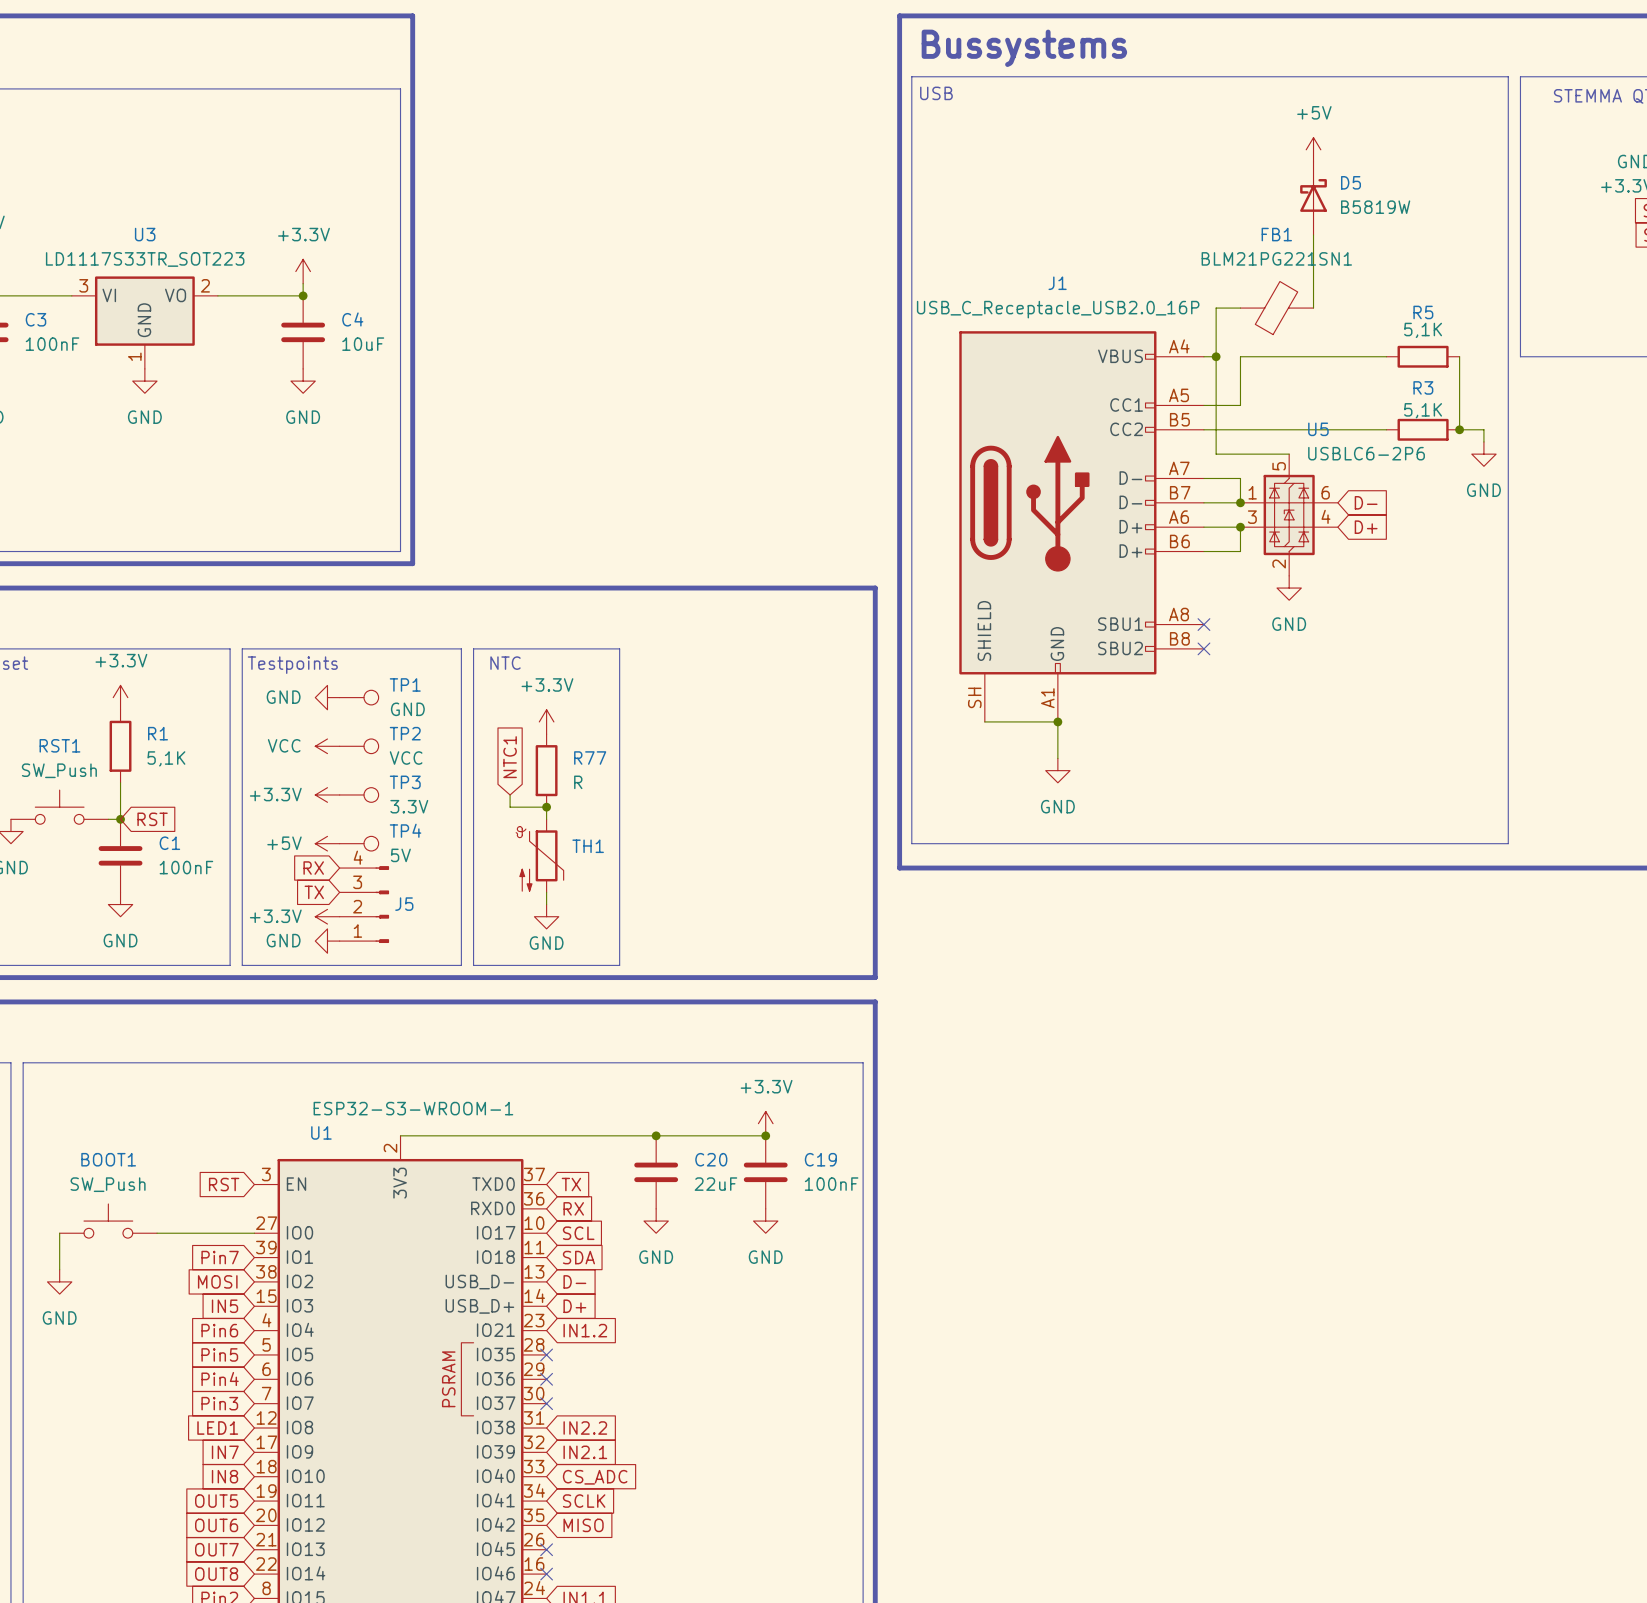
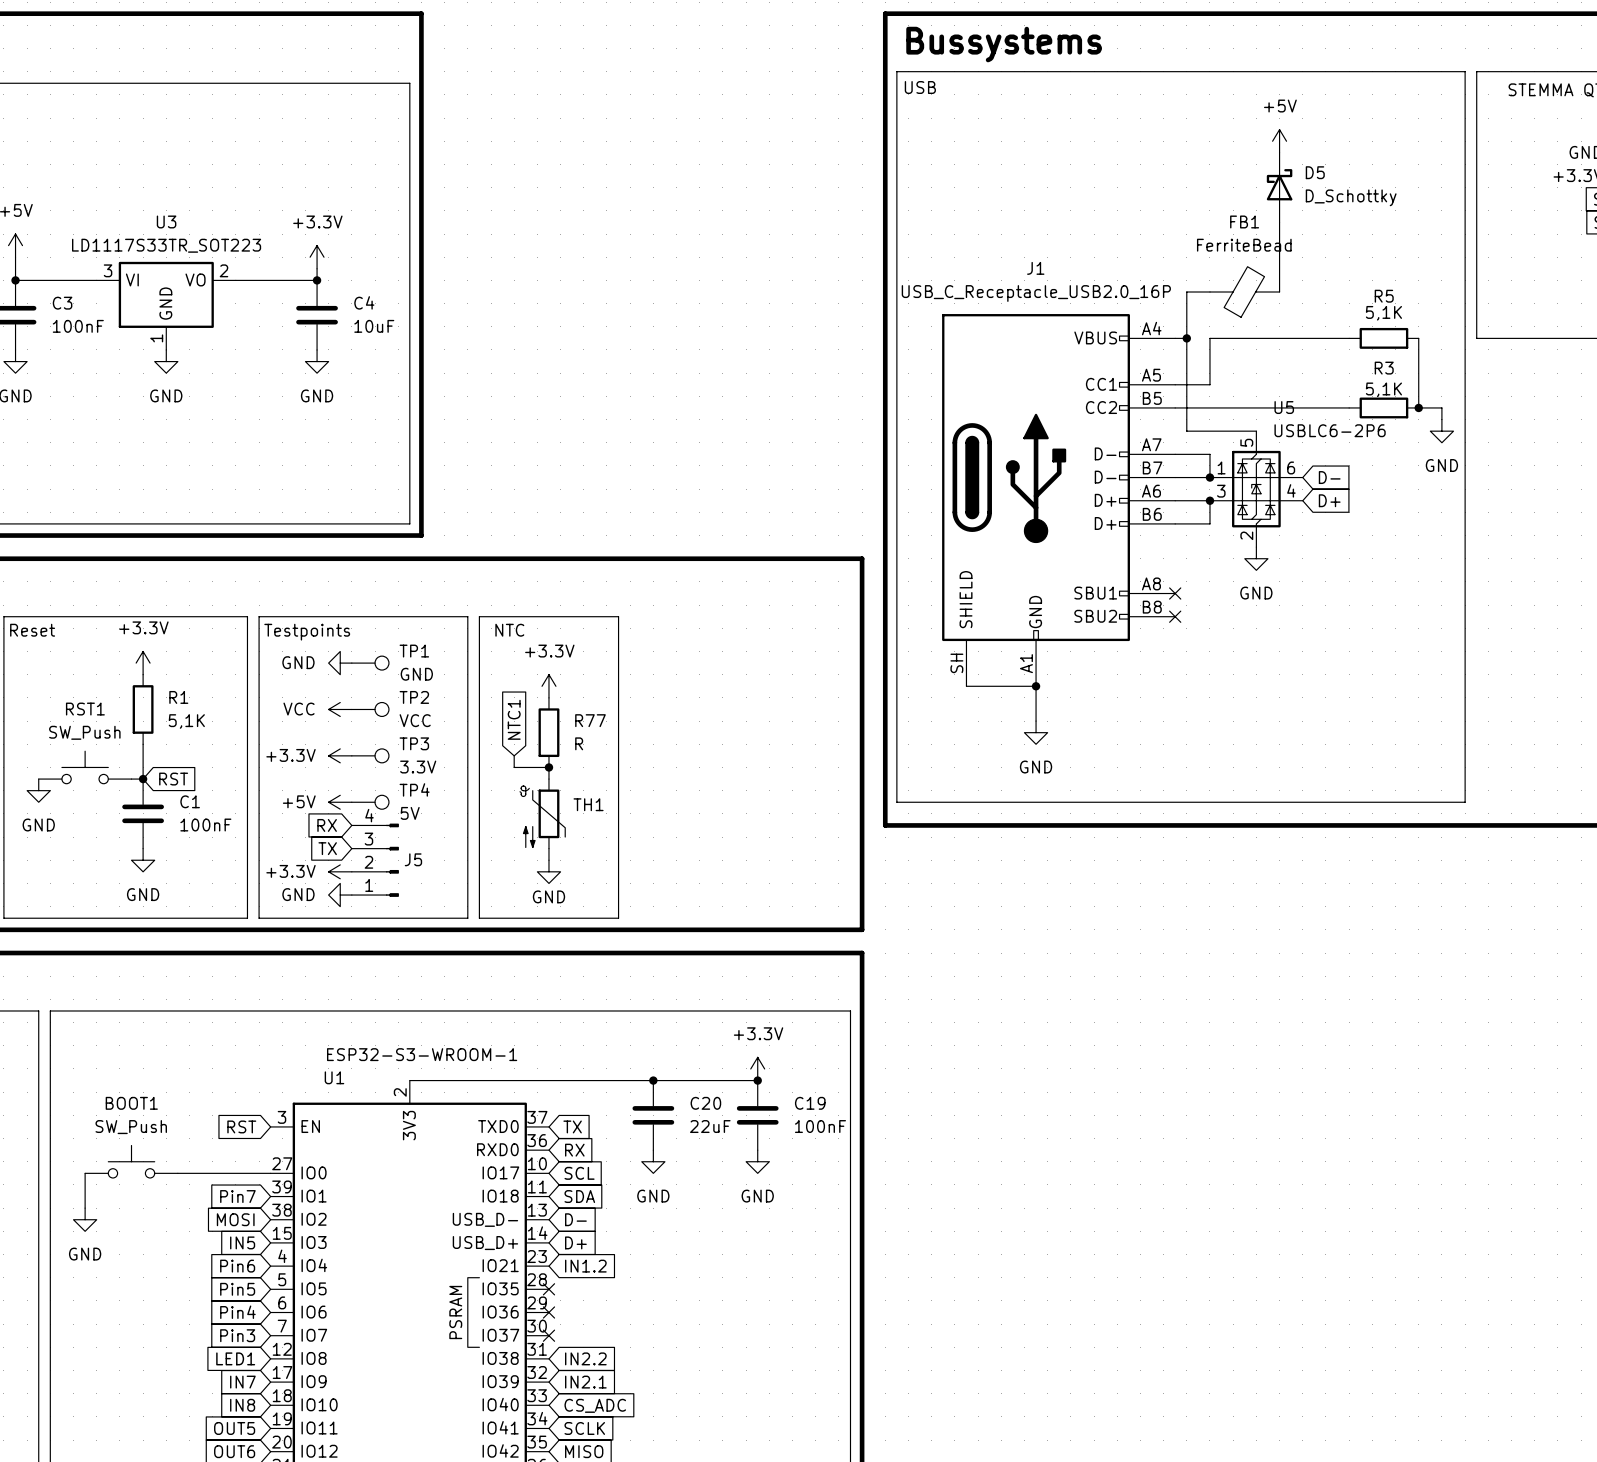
D5 value: B5819W (1375, 207) -> D_Schottky (1351, 197)
FB1 value: BLM21PG221SN1 (1276, 258) -> FerriteBead (1244, 245)

